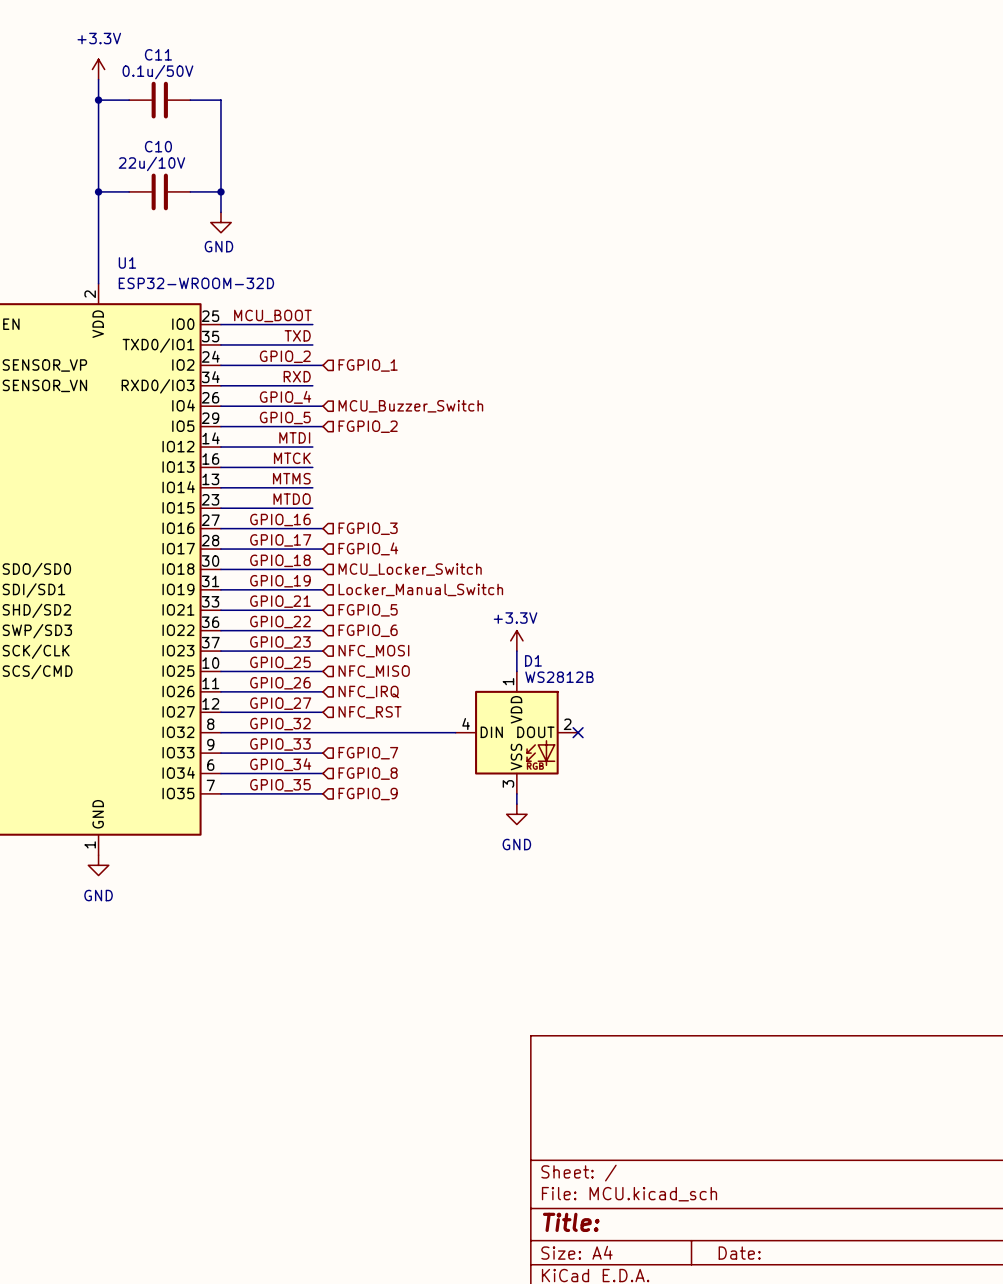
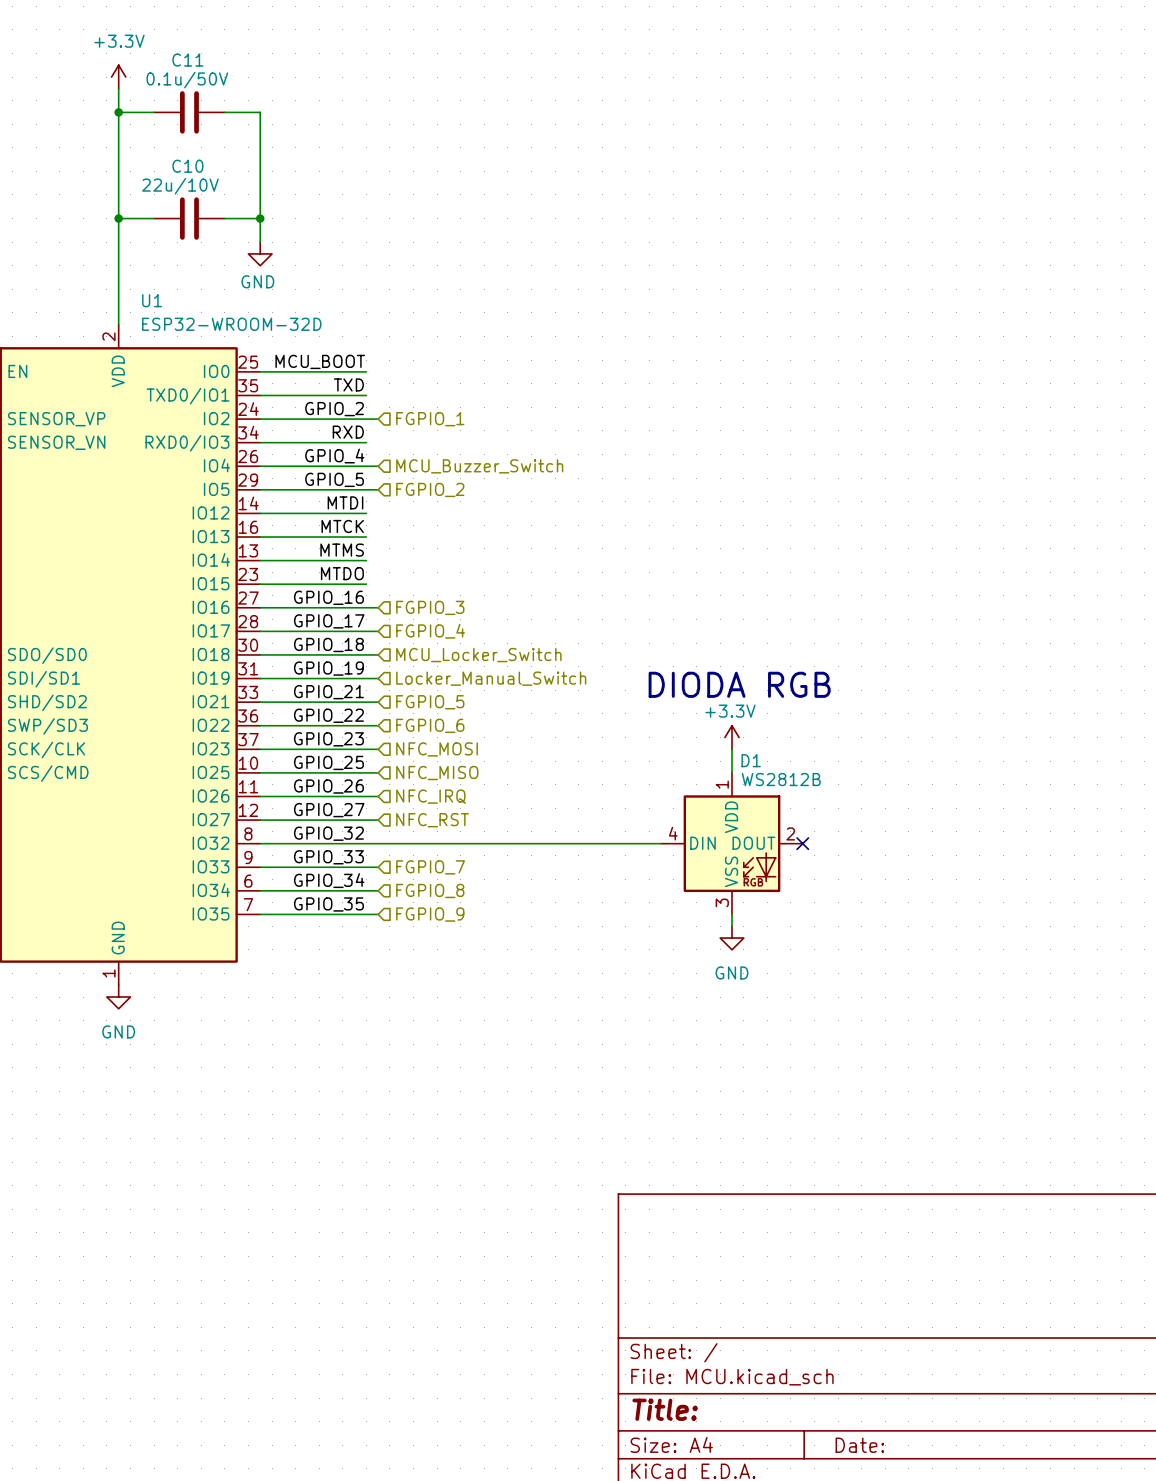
text: none -> DIODA RGB (739, 684)
power symbol position: +3.3V (516, 640) -> +3.3V (732, 737)
wire: (516, 651) (516, 671) -> (732, 749) (732, 772)
D1 position: (516, 732) -> (732, 843)
no-connect mark: (578, 732) -> none
no-connect mark: none -> (802, 843)
wire: (516, 793) (516, 804) -> (732, 914) (732, 926)
power symbol position: GND (516, 814) -> GND (732, 938)

